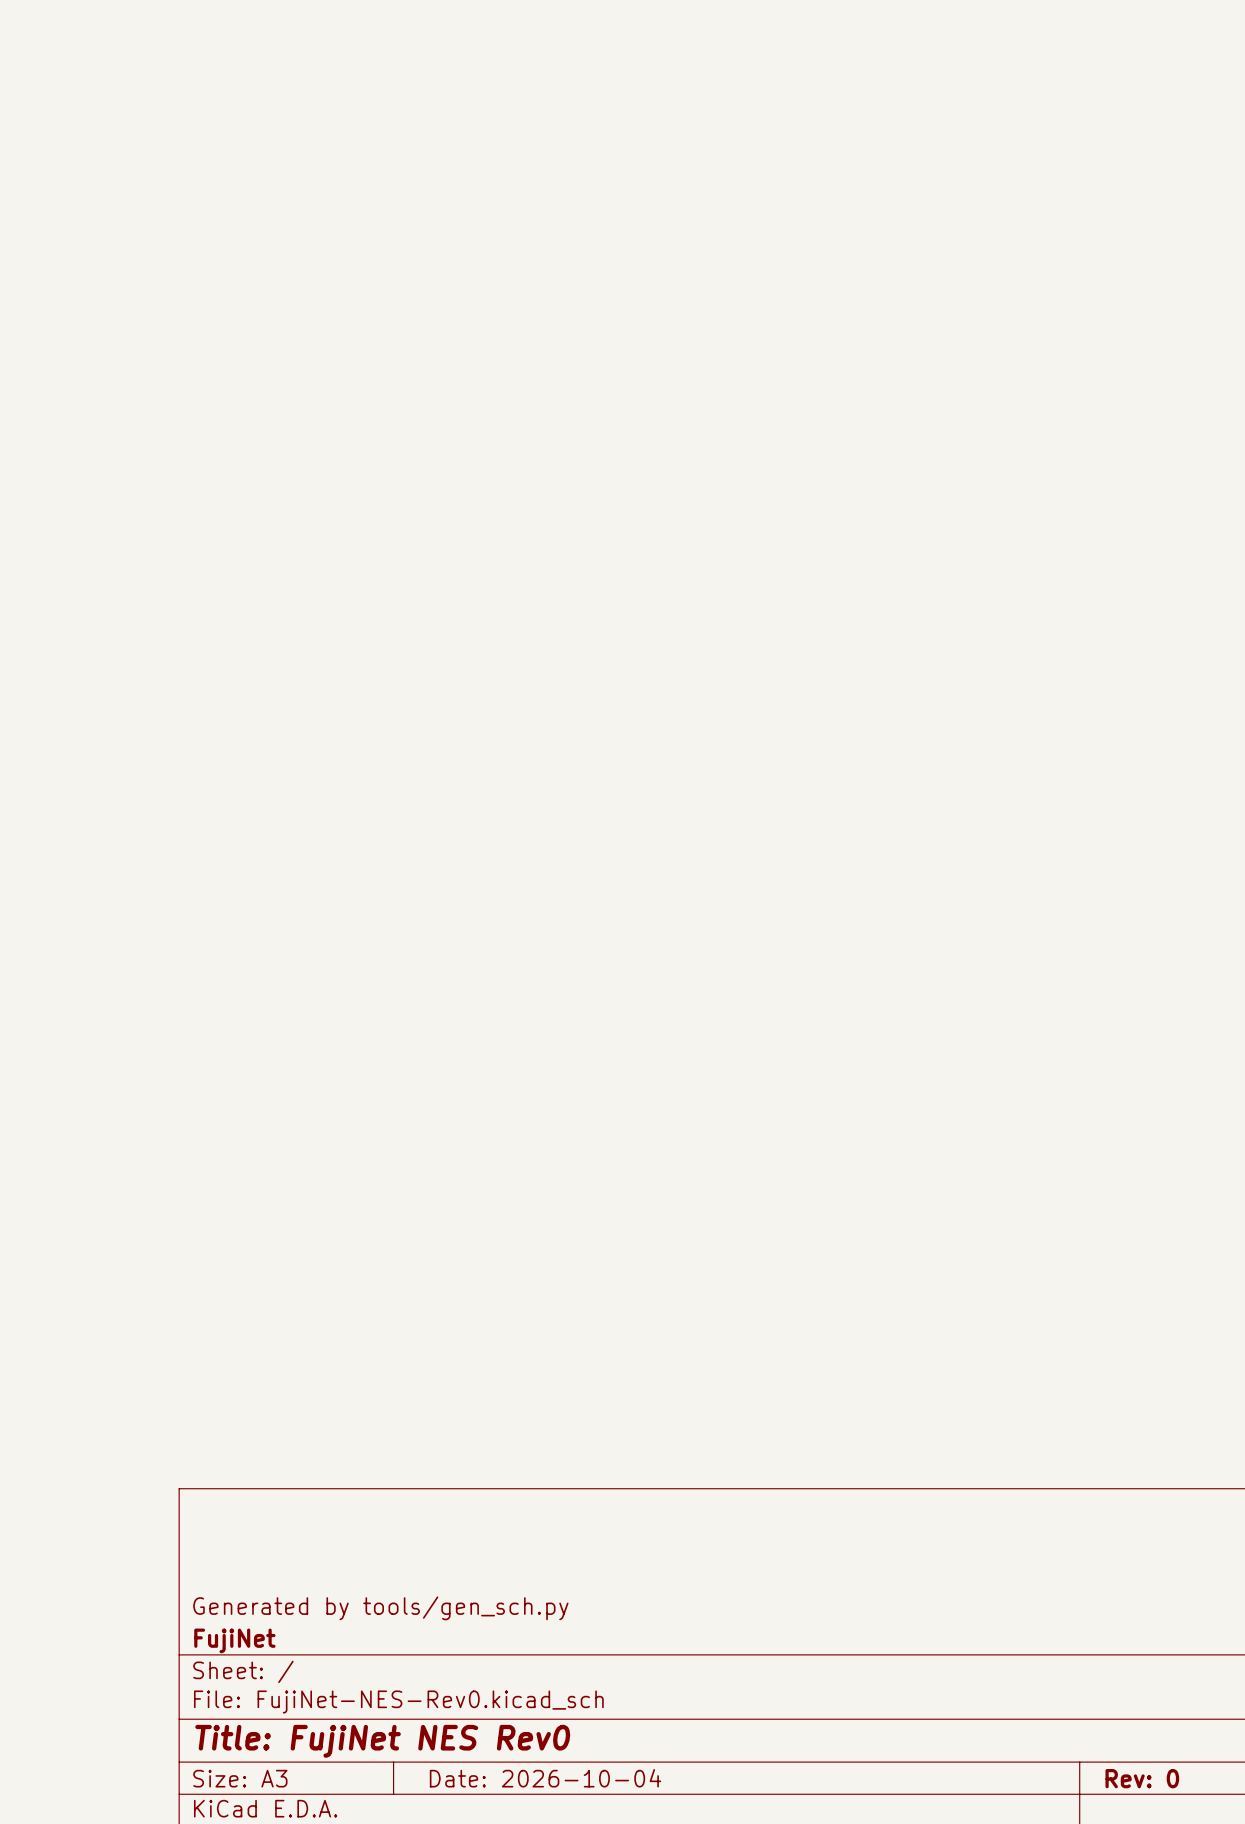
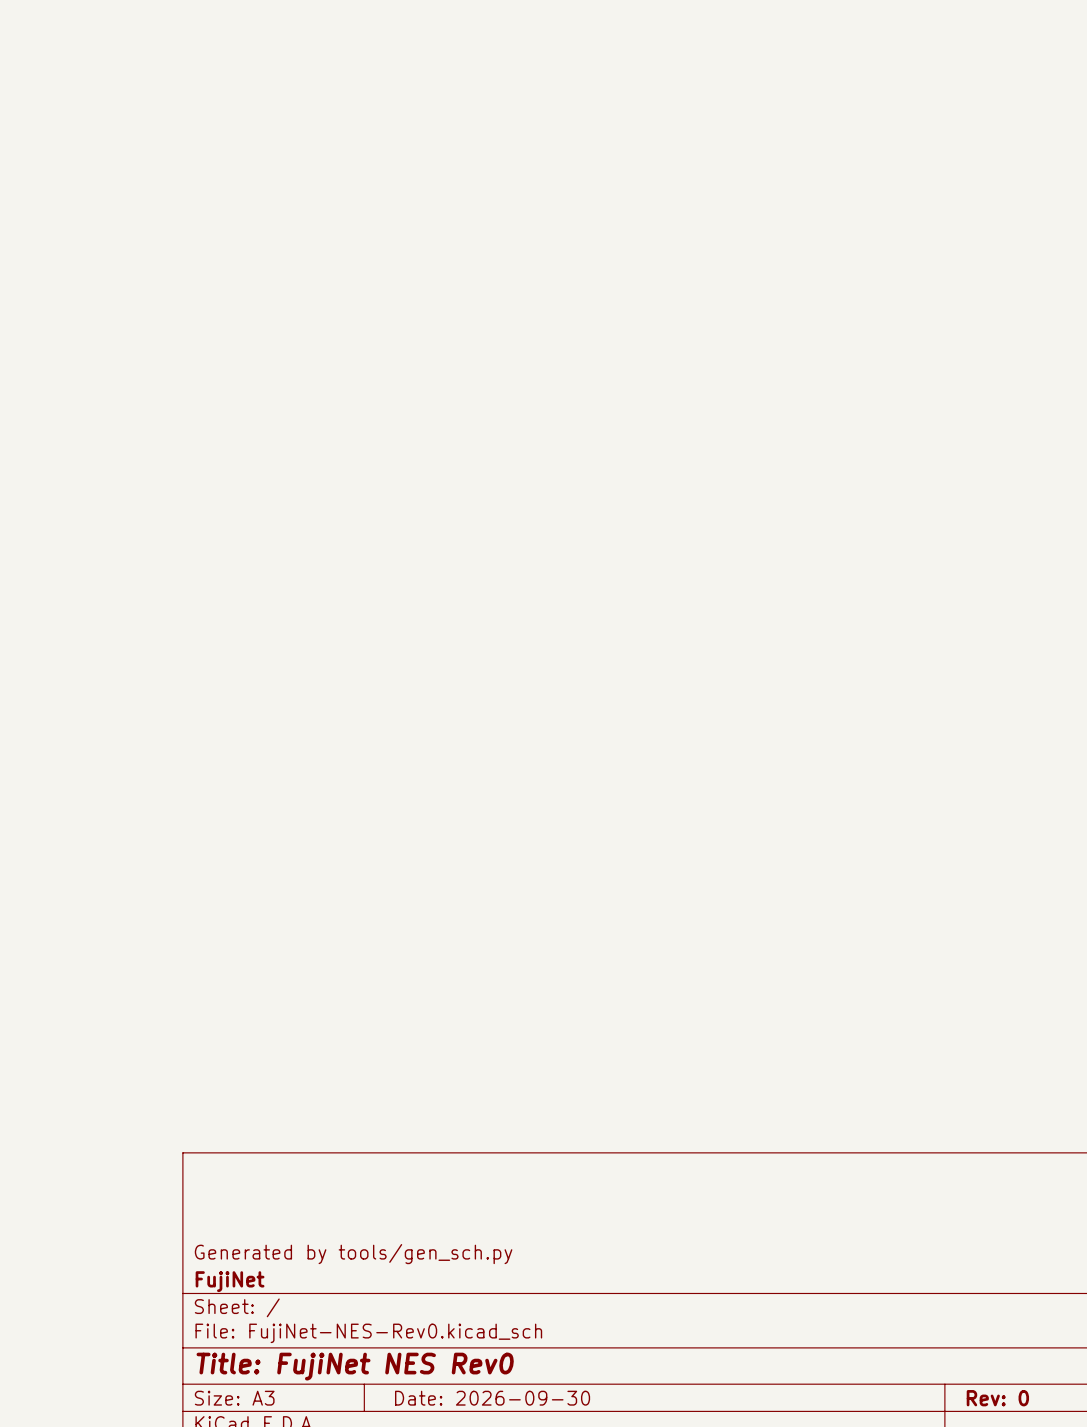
title block: Date: 2026-10-04 (545, 1778) -> Date: 2026-09-30 (492, 1398)

